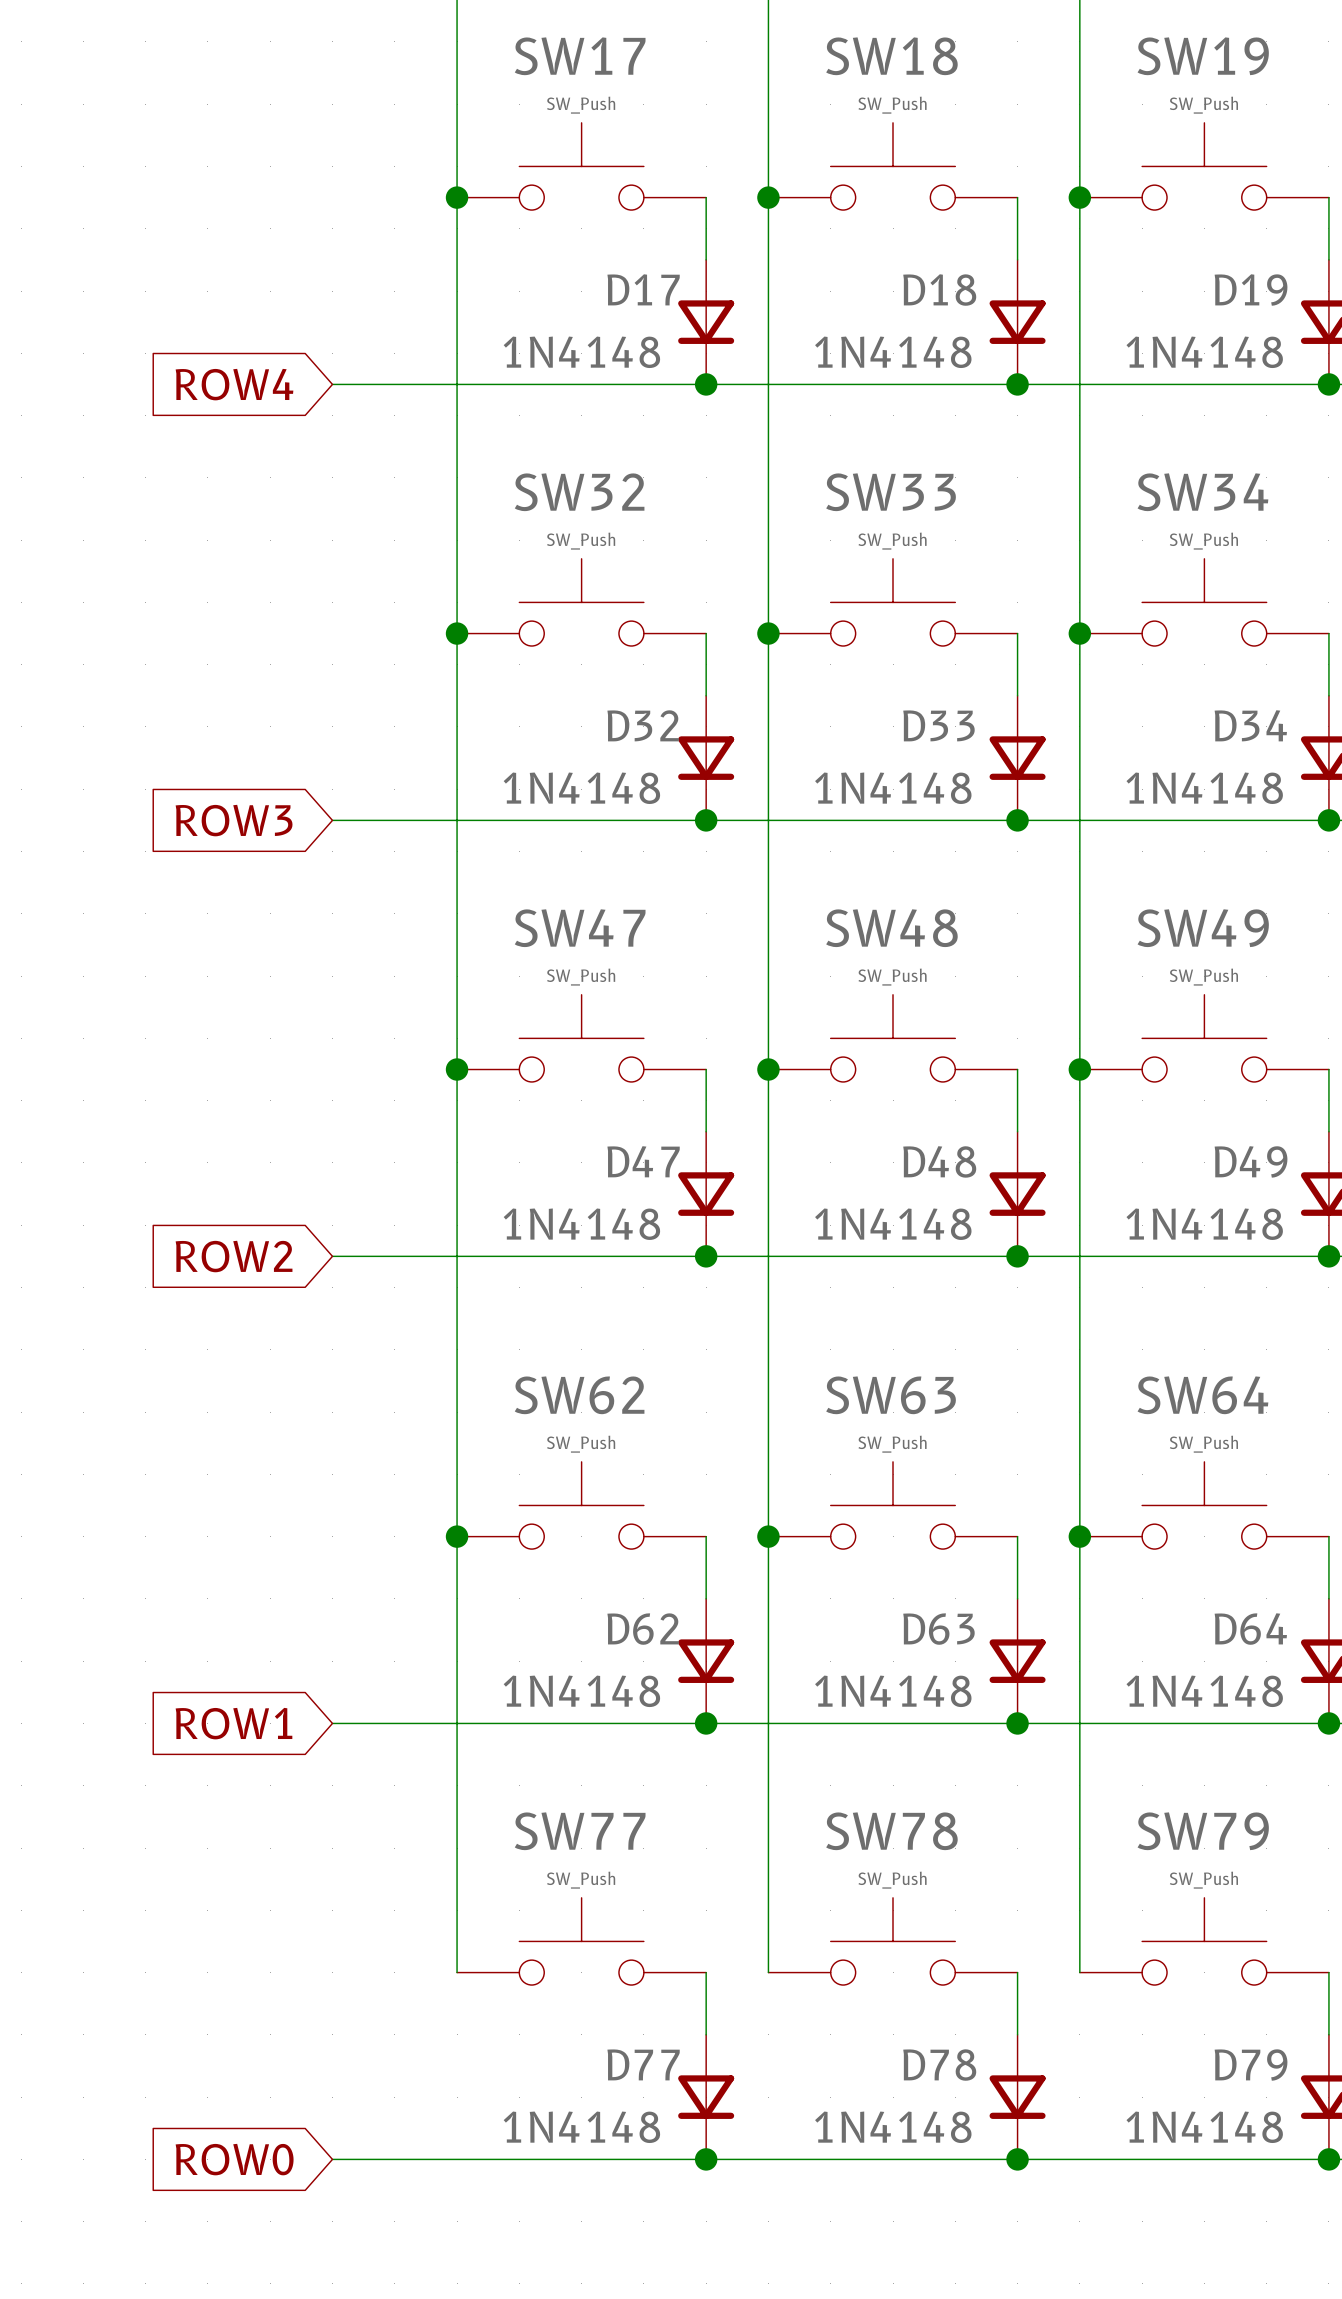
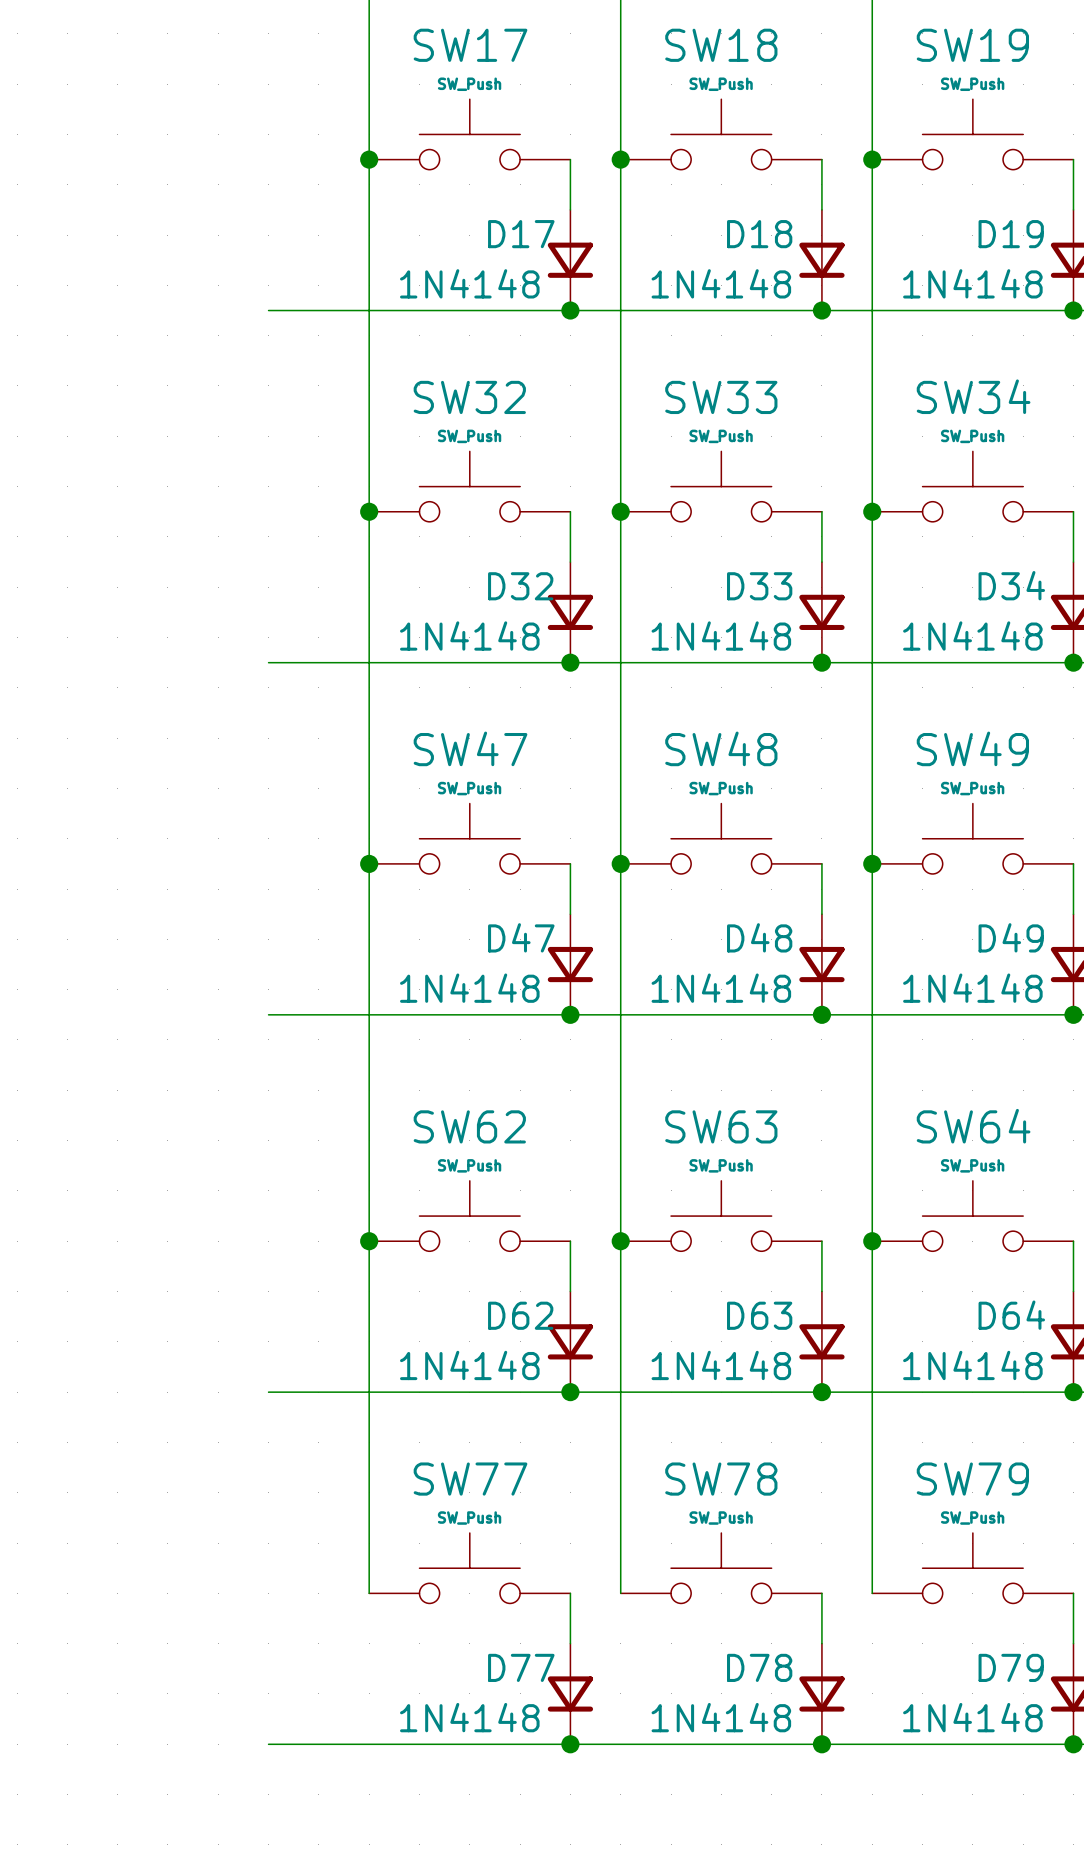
global label: ROW4 (234, 384) -> none
global label: ROW3 (234, 820) -> none
global label: ROW2 (234, 1256) -> none
global label: ROW1 (233, 1723) -> none
global label: ROW0 (234, 2159) -> none

